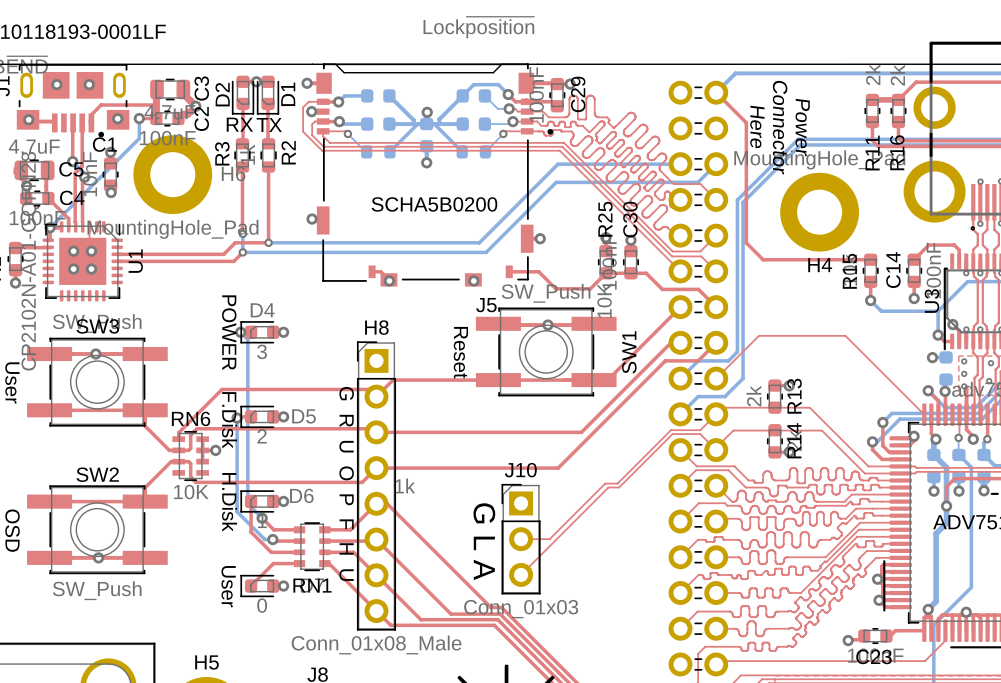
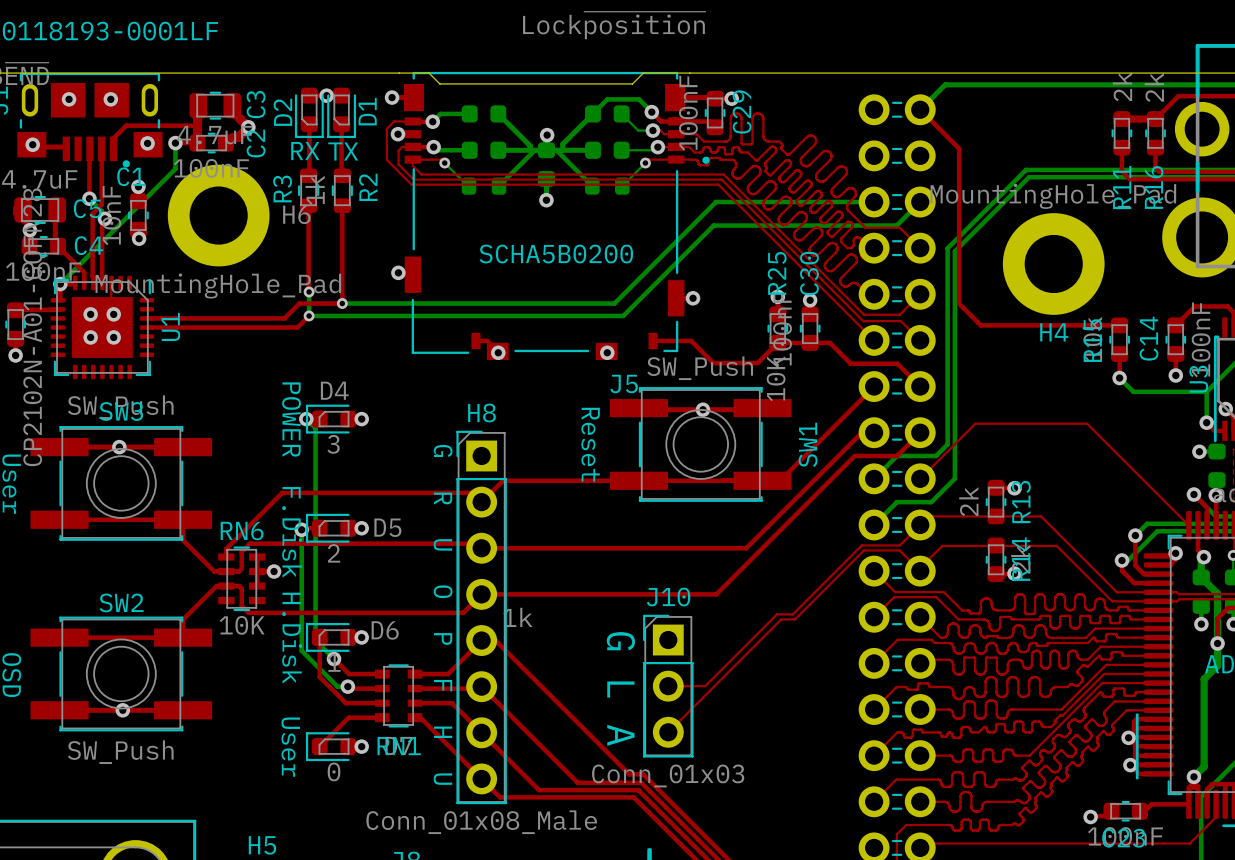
text: Here (757, 127) -> none
text: Connector (780, 127) -> none
text: Power (802, 127) -> none

